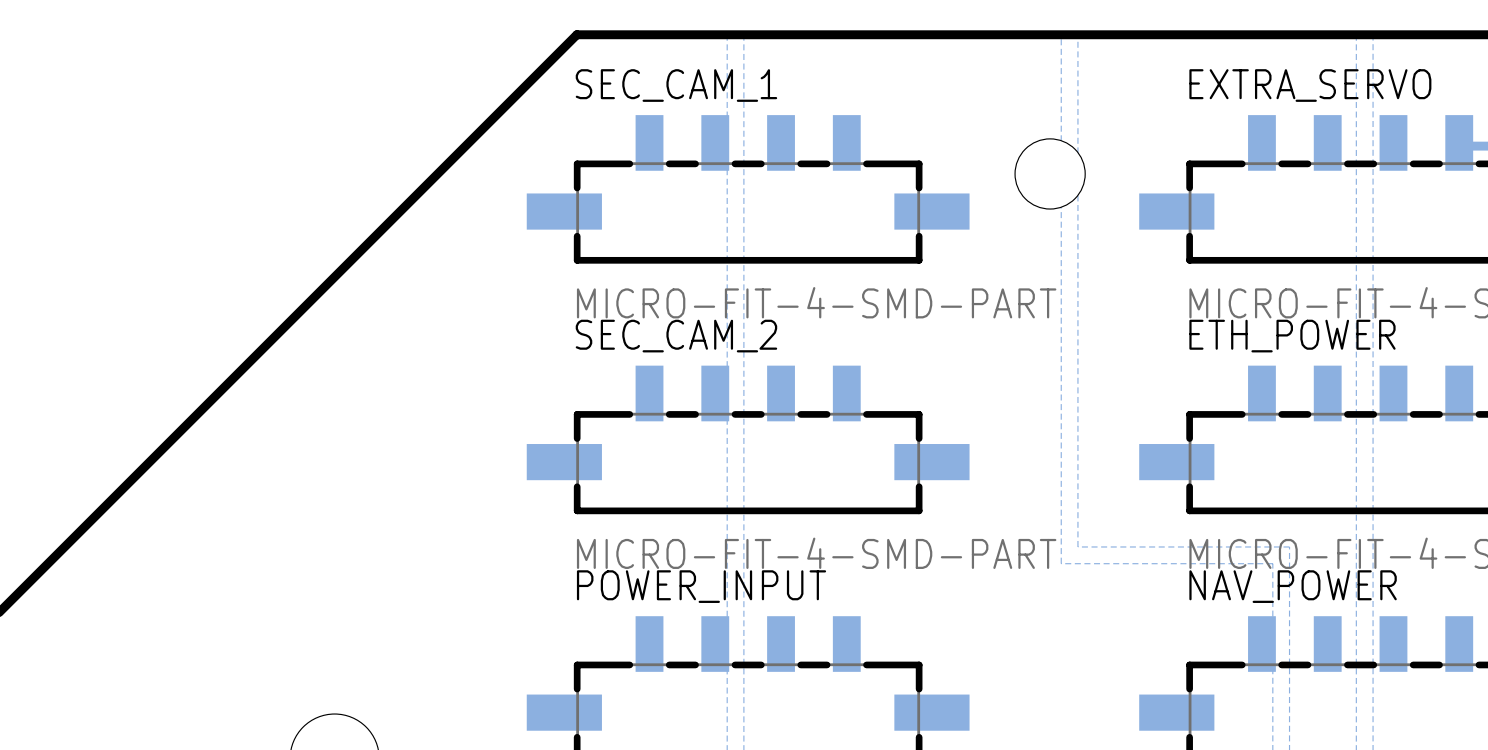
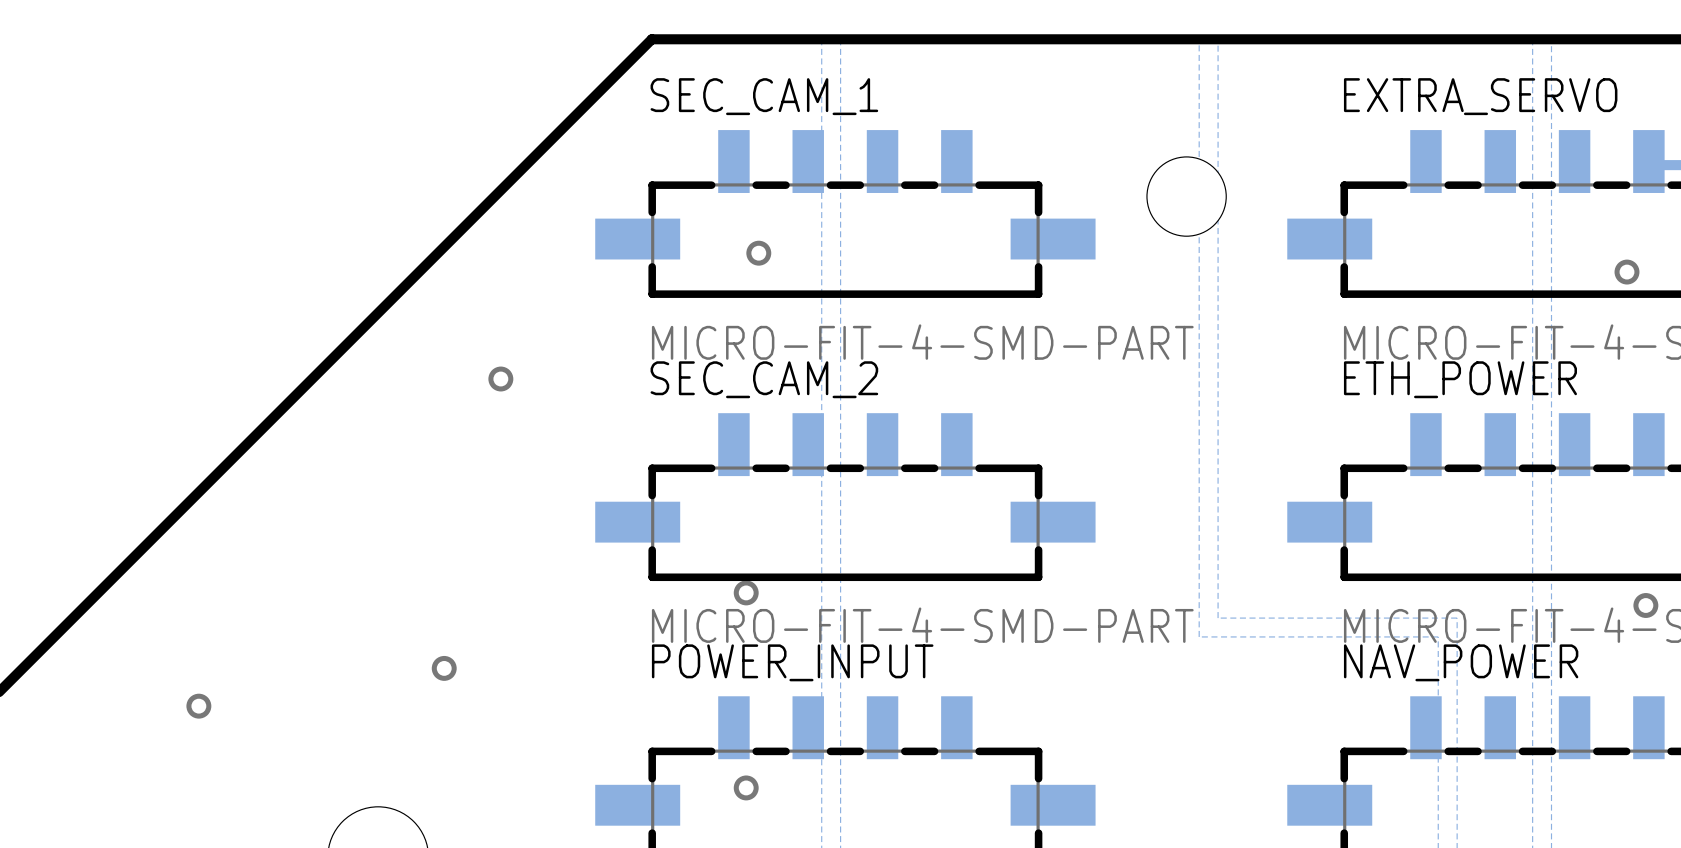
via: none -> (758, 253)
via: none -> (1626, 272)
via: none -> (500, 379)
via: none -> (746, 592)
via: none -> (1645, 605)
via: none -> (444, 668)
via: none -> (198, 706)
via: none -> (746, 787)

